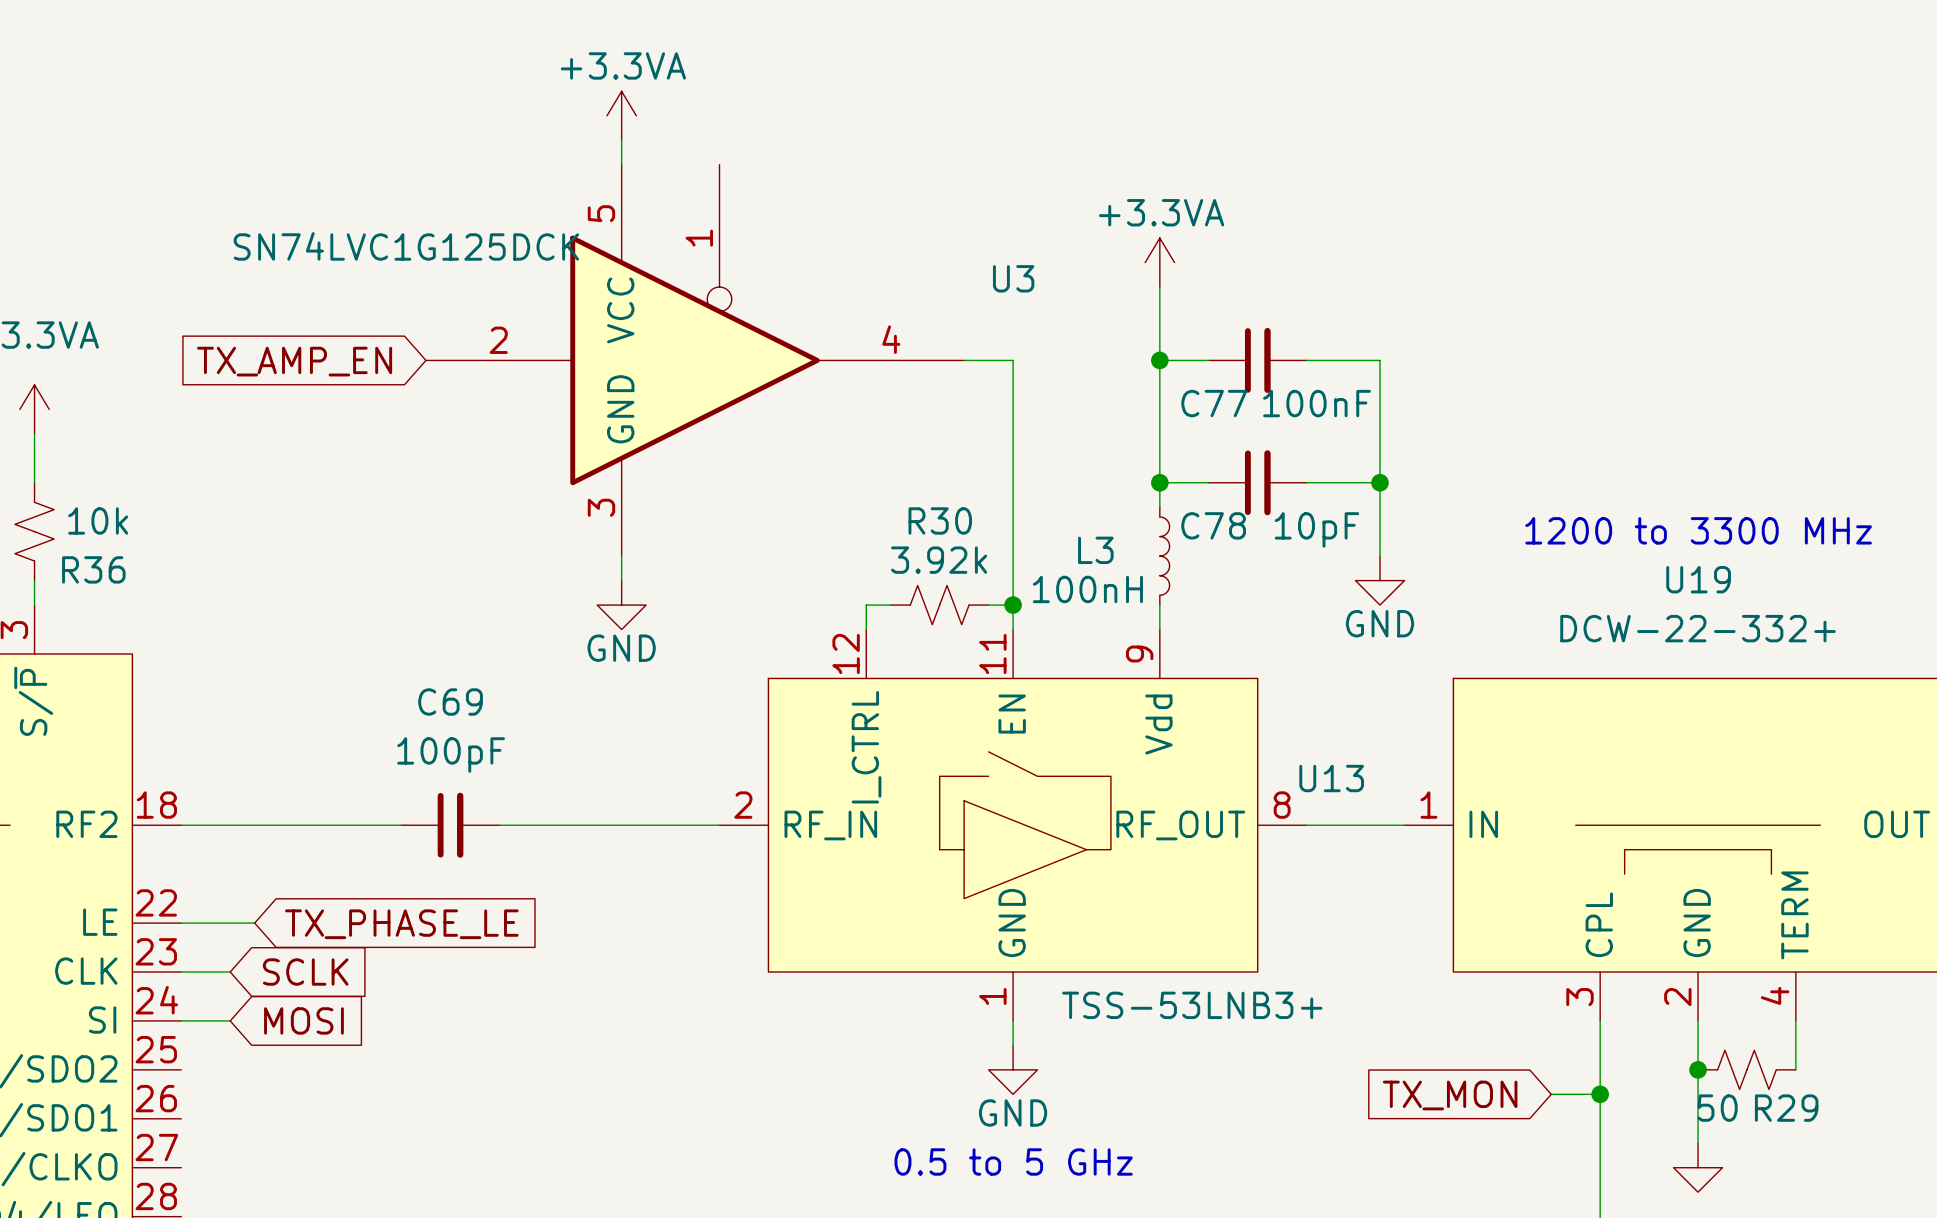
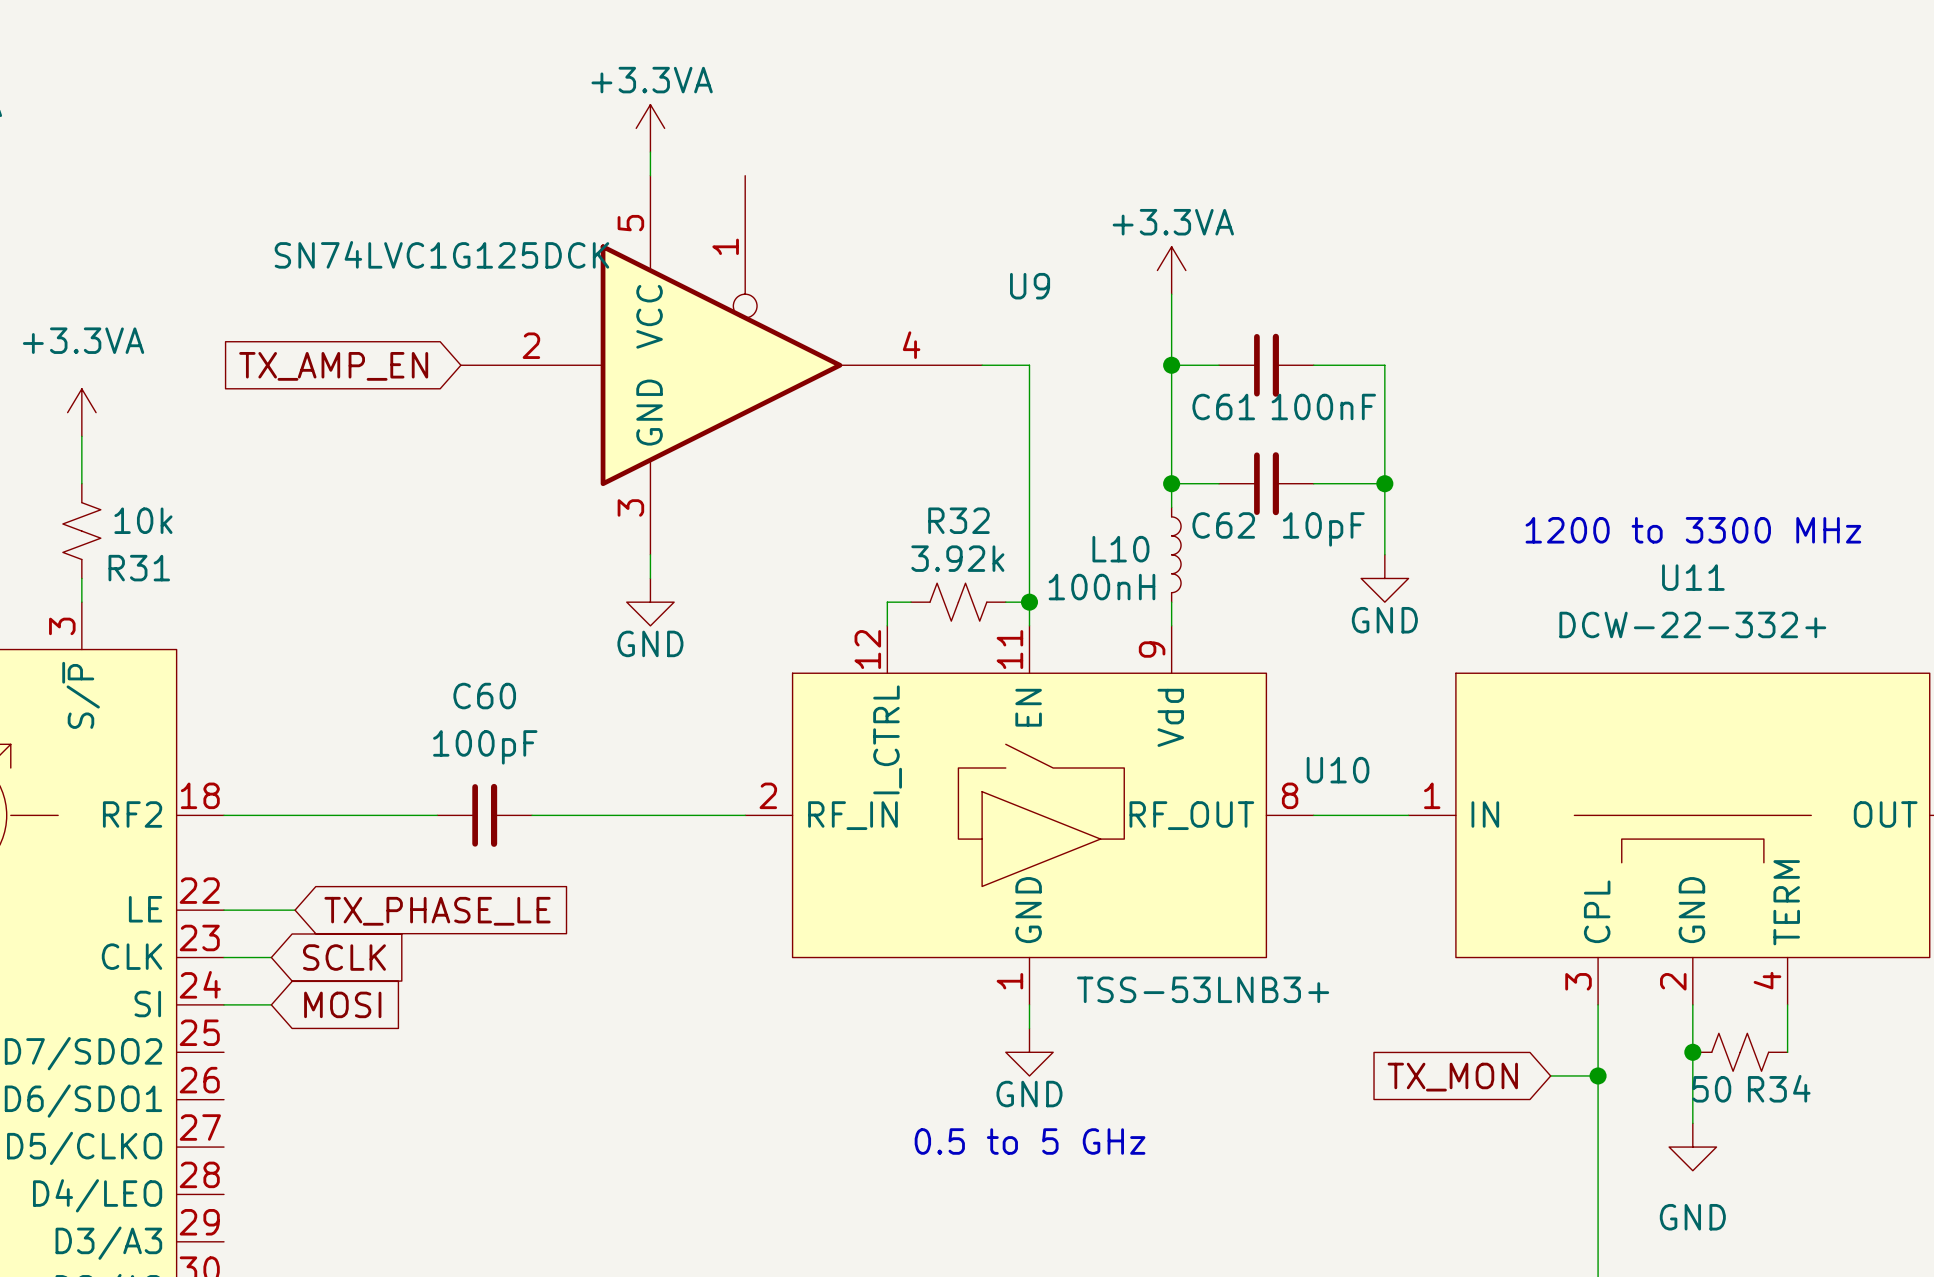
U3 name: U3 (1013, 278) -> U9 (1030, 286)
C77 name: C77 (1214, 403) -> C61 (1223, 407)
R30 name: R30 (940, 520) -> R32 (958, 520)
C78 name: C78 (1213, 525) -> C62 (1223, 525)
L3 name: L3 (1095, 550) -> L10 (1120, 549)
R36 name: R36 (93, 569) -> R31 (139, 568)
U19 name: U19 (1698, 579) -> U11 (1693, 577)
C69 name: C69 (450, 702) -> C60 (484, 696)
U13 name: U13 (1331, 778) -> U10 (1338, 770)
R29 name: R29 (1786, 1108) -> R34 (1779, 1088)

